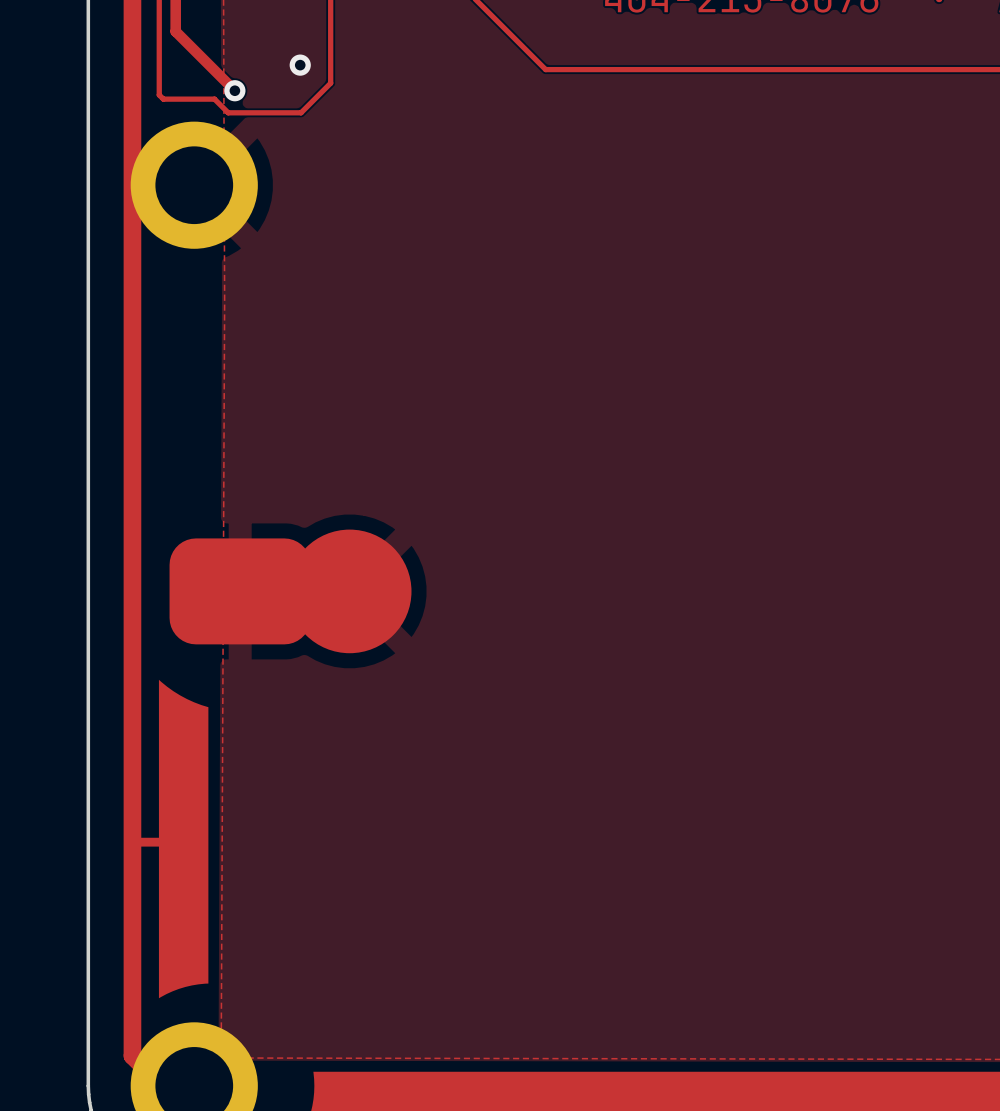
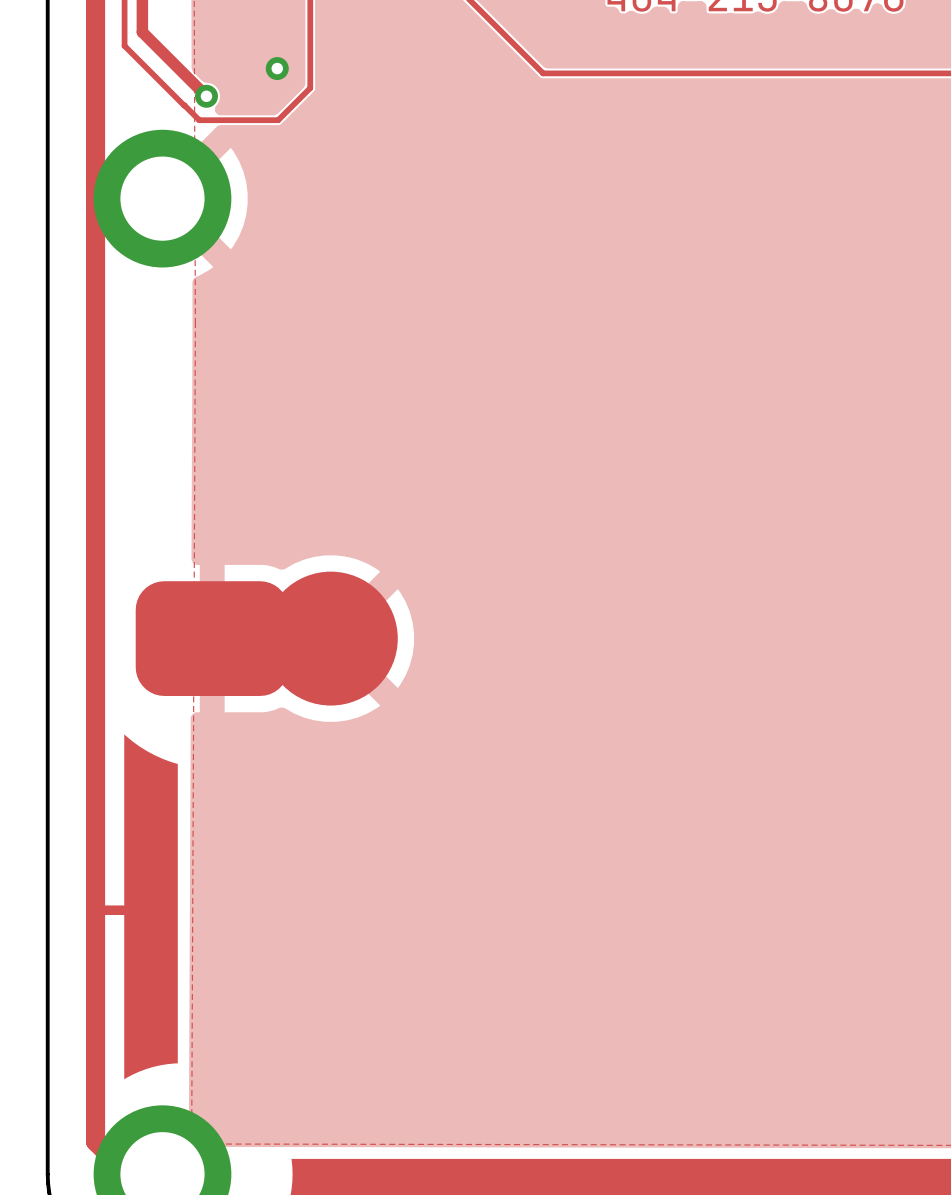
track: (159, 44) (159, 95) (163, 99) (214, 99) -> (124, 45) (184, 105)

